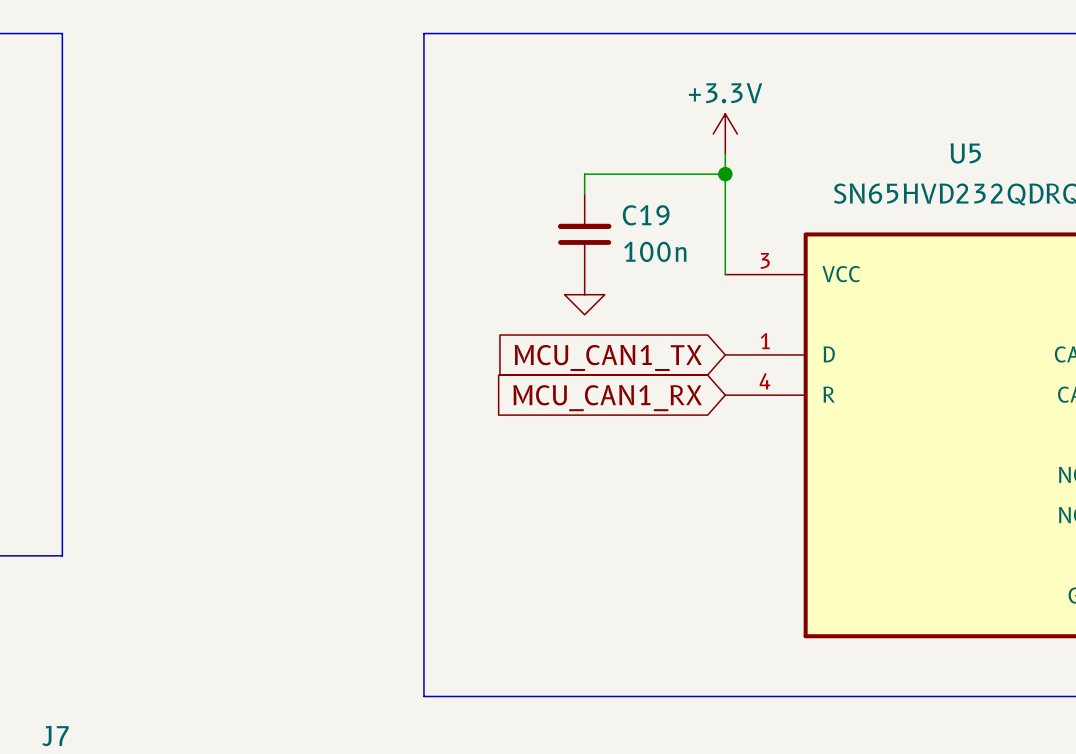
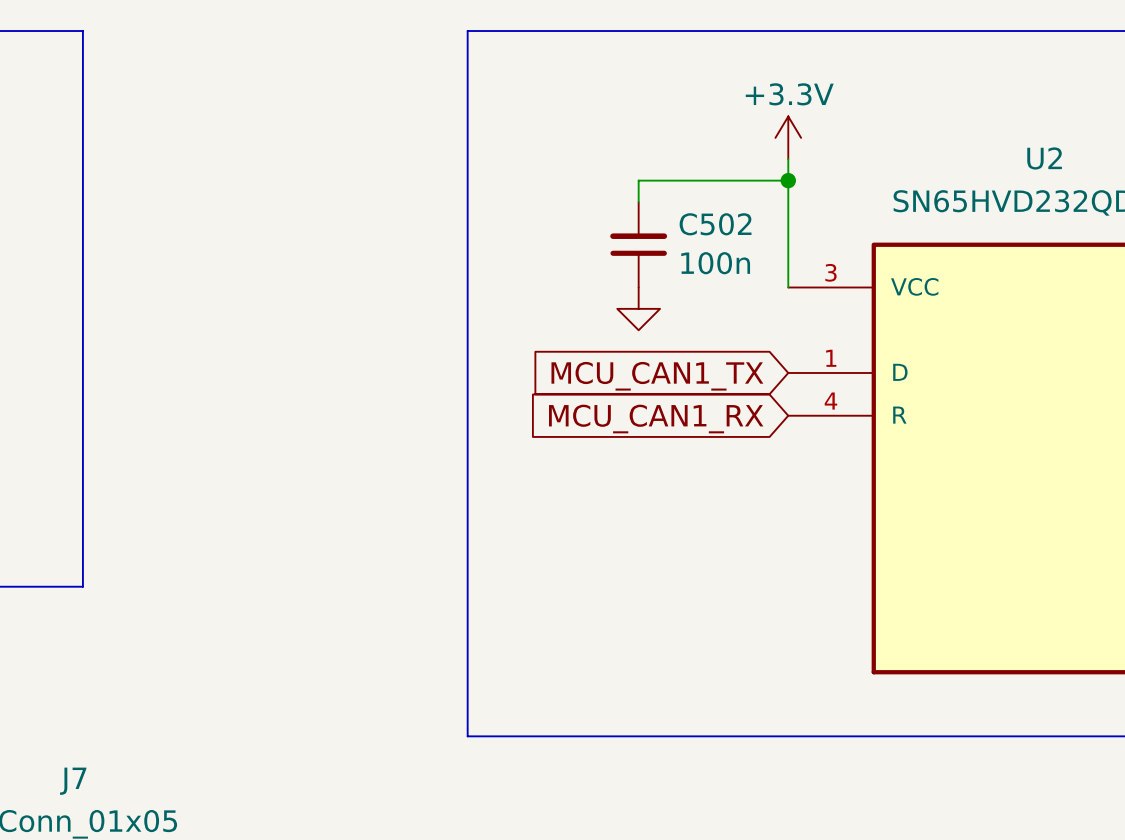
U5 name: U5 (965, 153) -> U2 (1044, 158)
C19 name: C19 (646, 215) -> C502 (715, 224)

